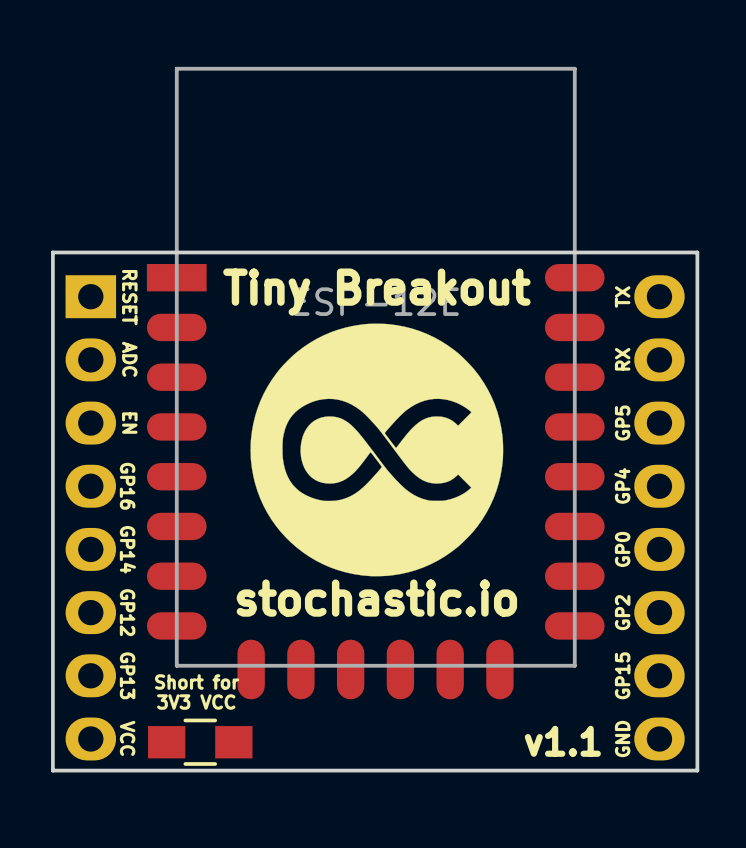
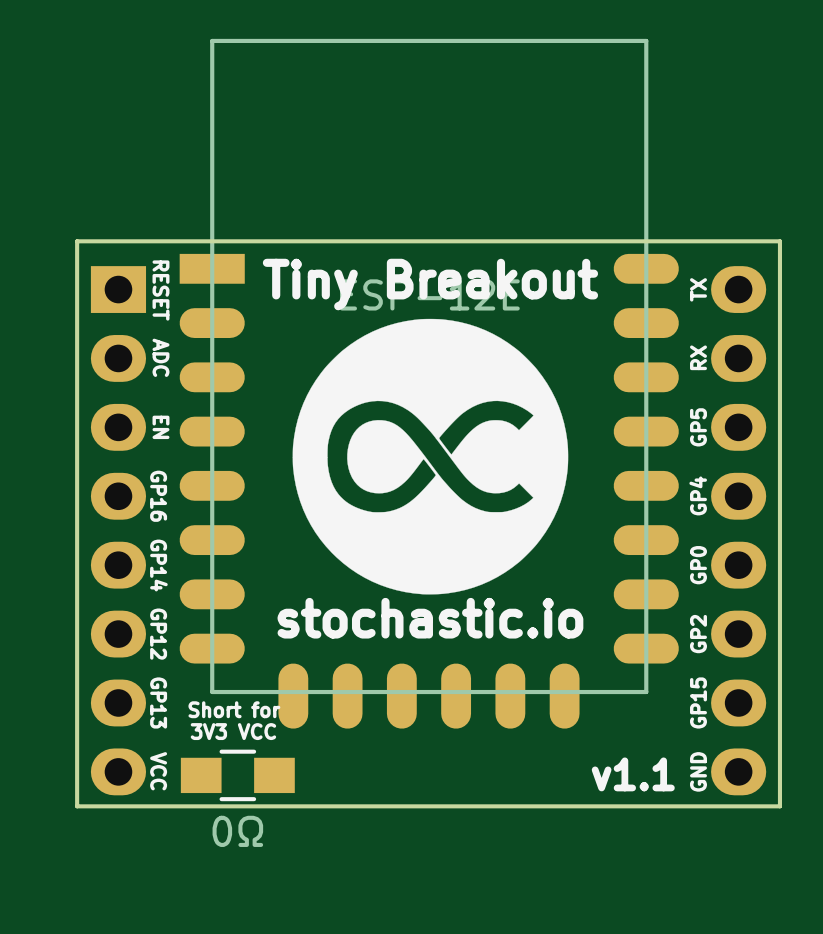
part value: none -> 0Ω (237, 831)

